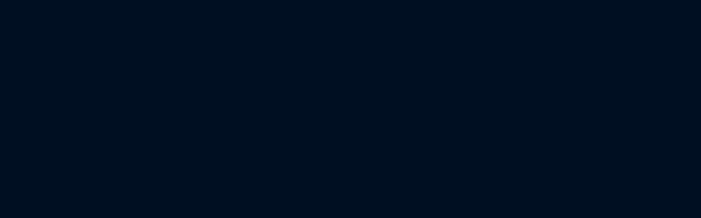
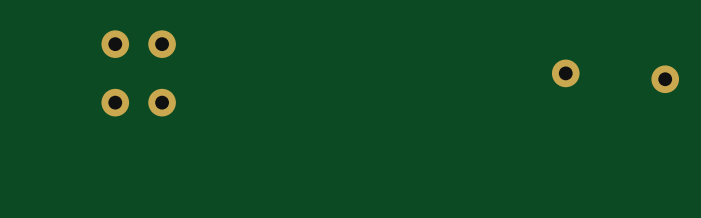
via: none -> (115, 44)
via: none -> (162, 44)
via: none -> (565, 73)
via: none -> (665, 79)
via: none -> (115, 102)
via: none -> (162, 102)

